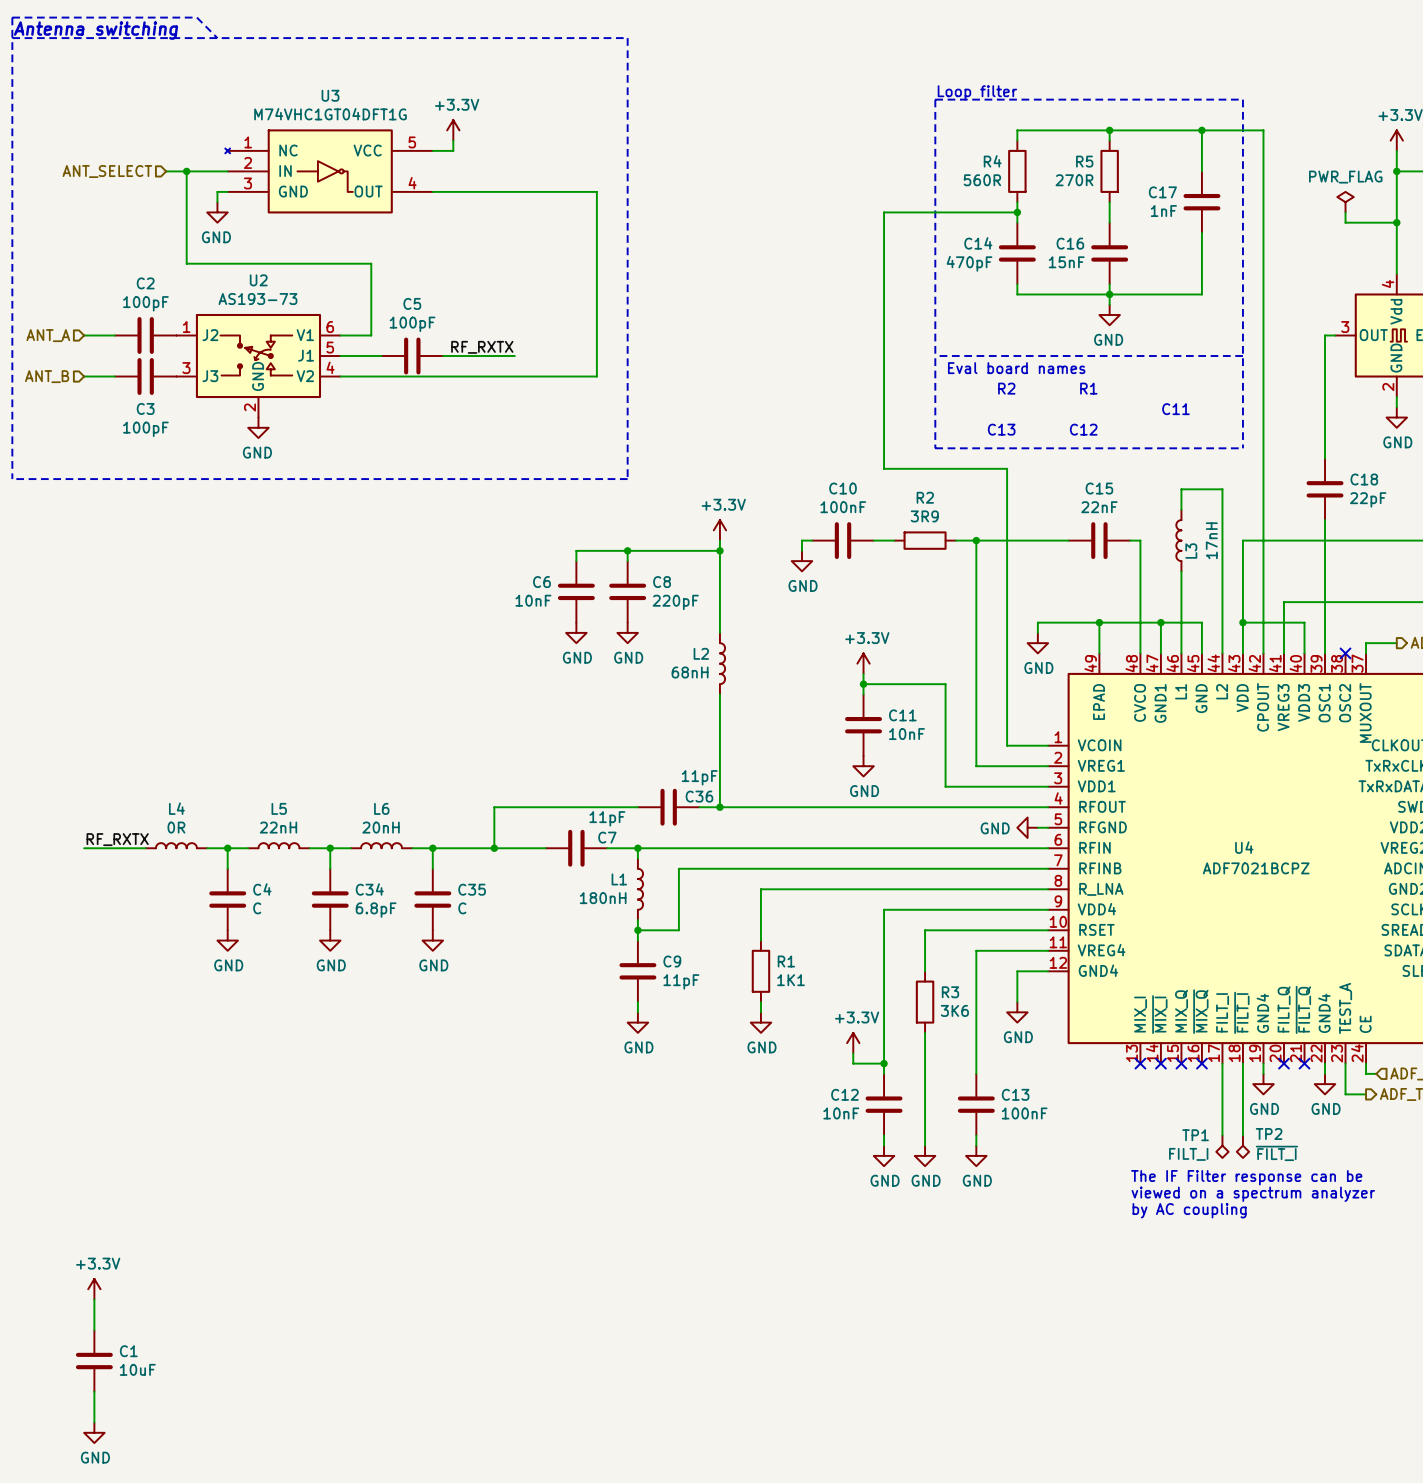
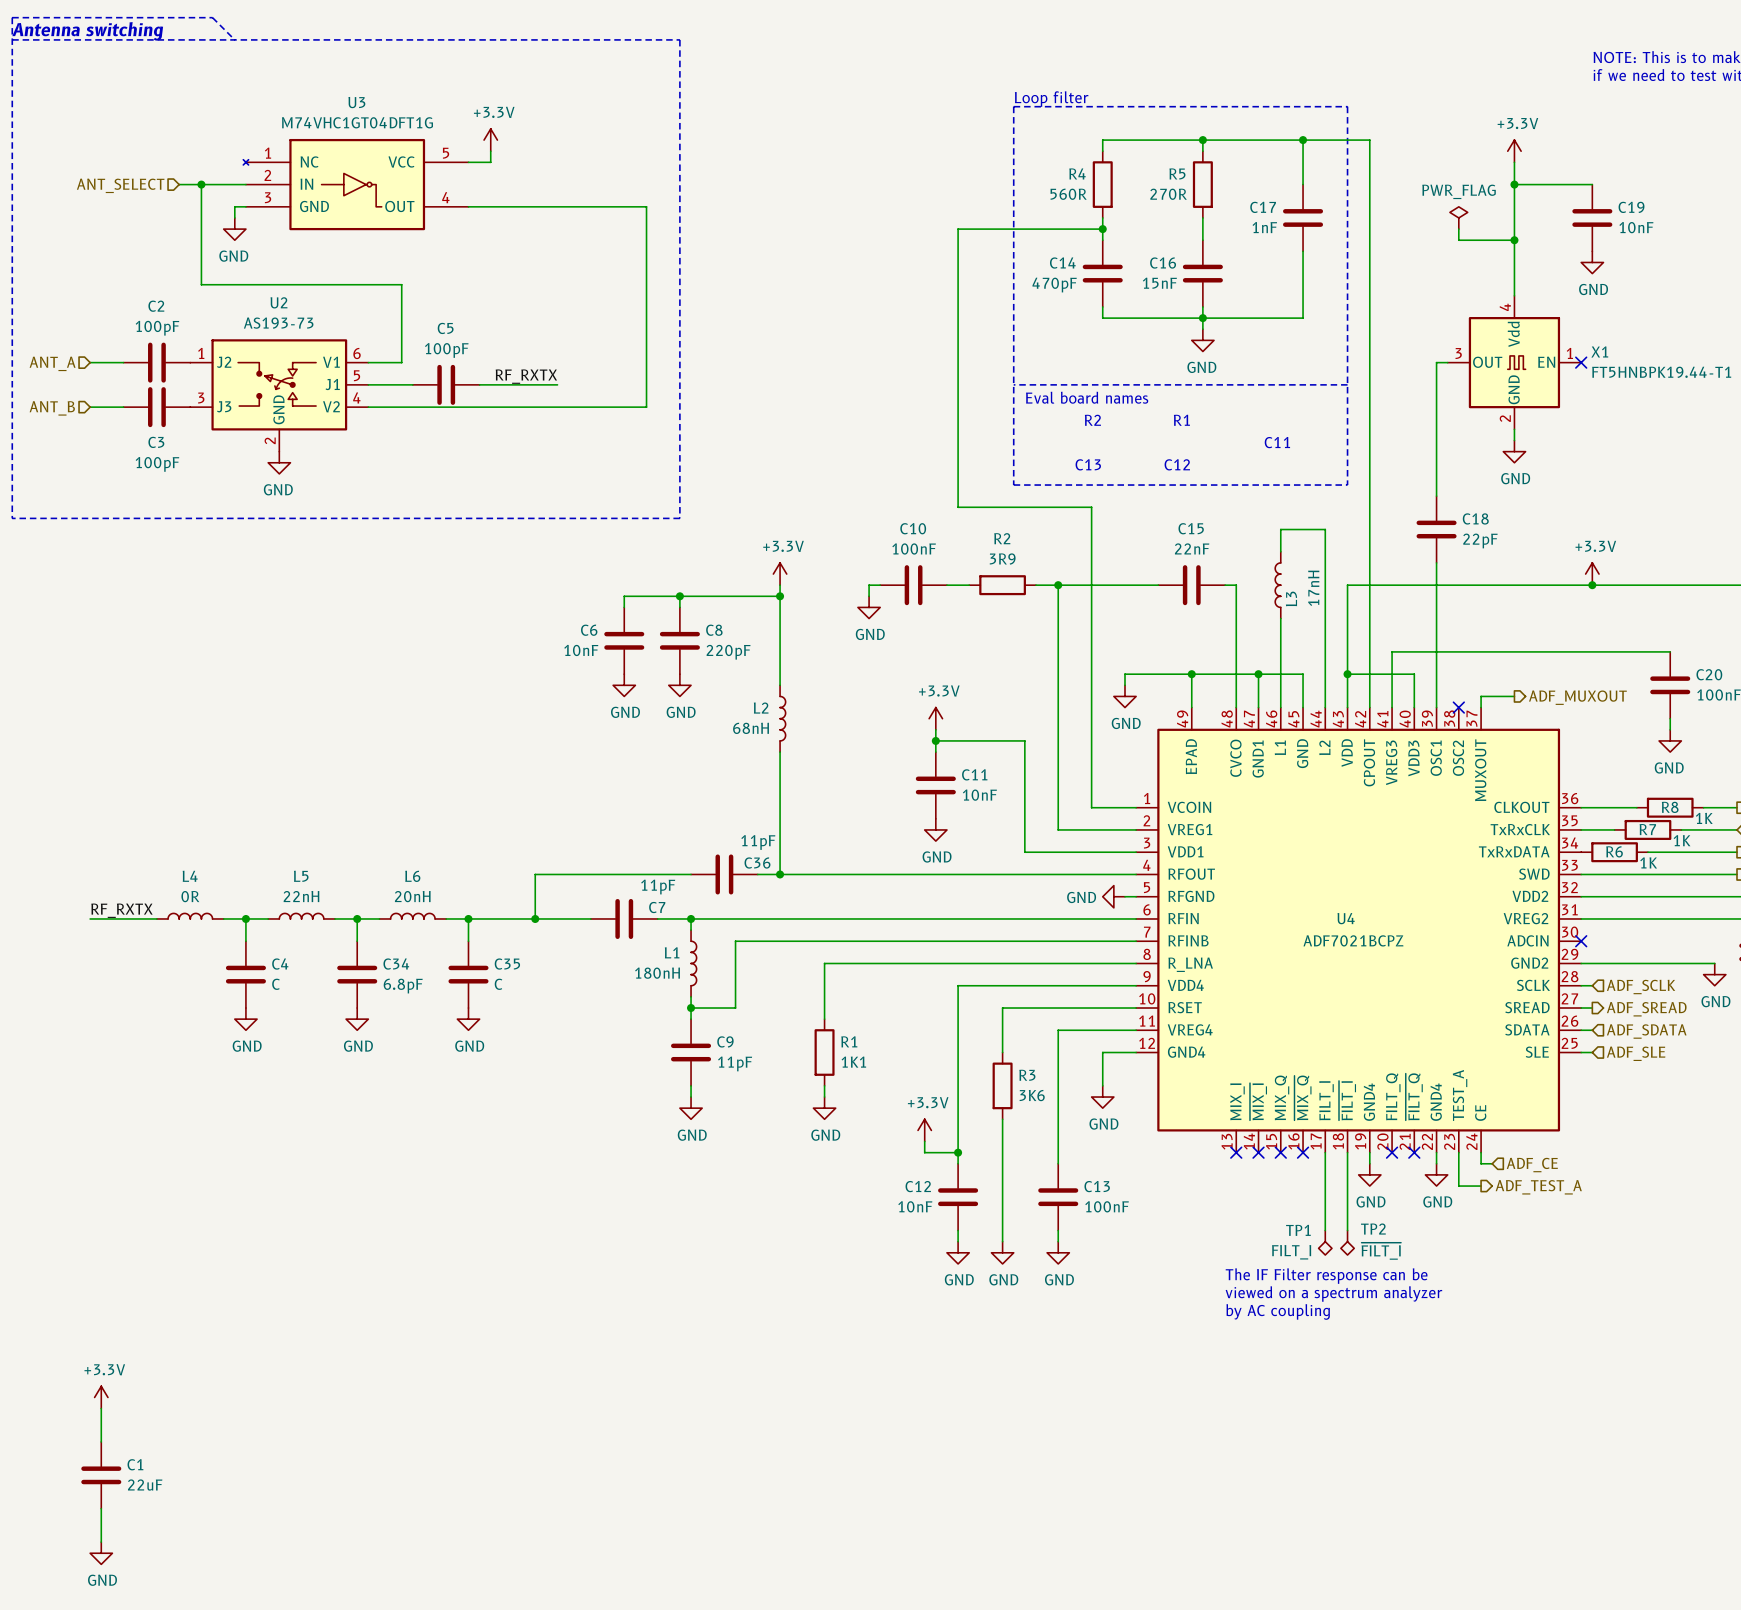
C1 value: 10uF (137, 1369) -> 22uF (145, 1485)

